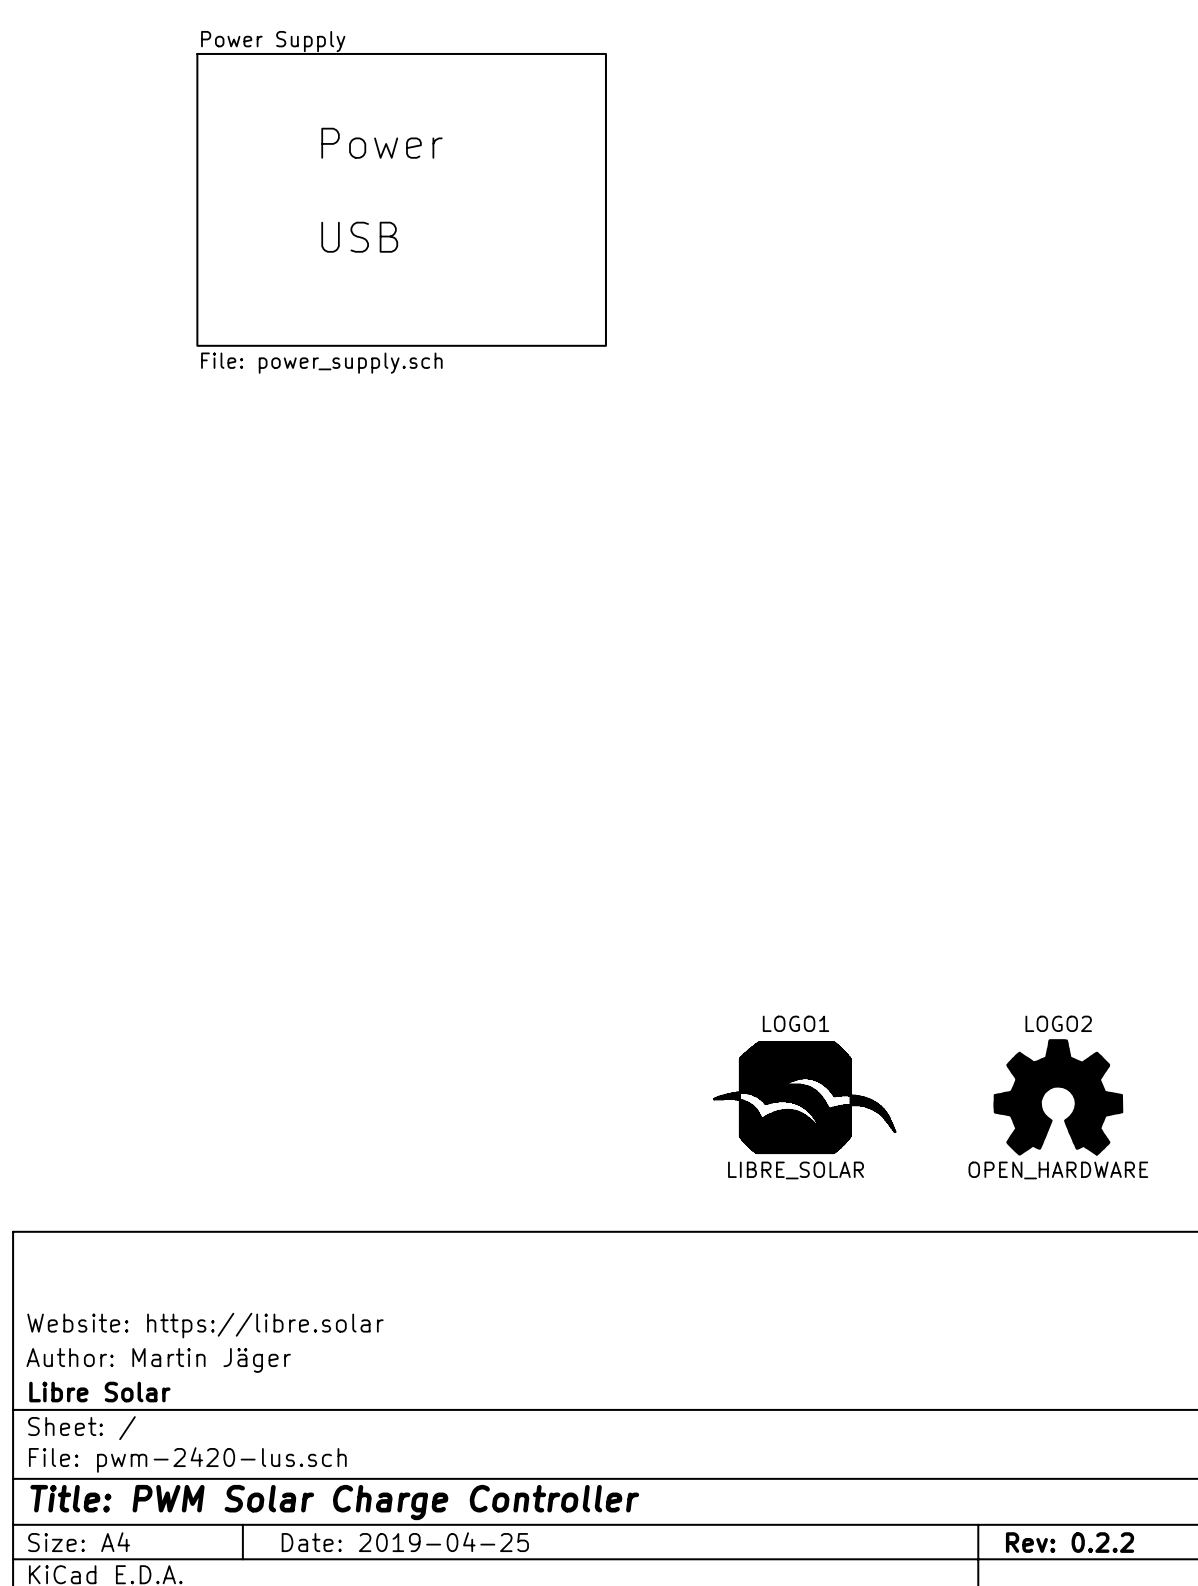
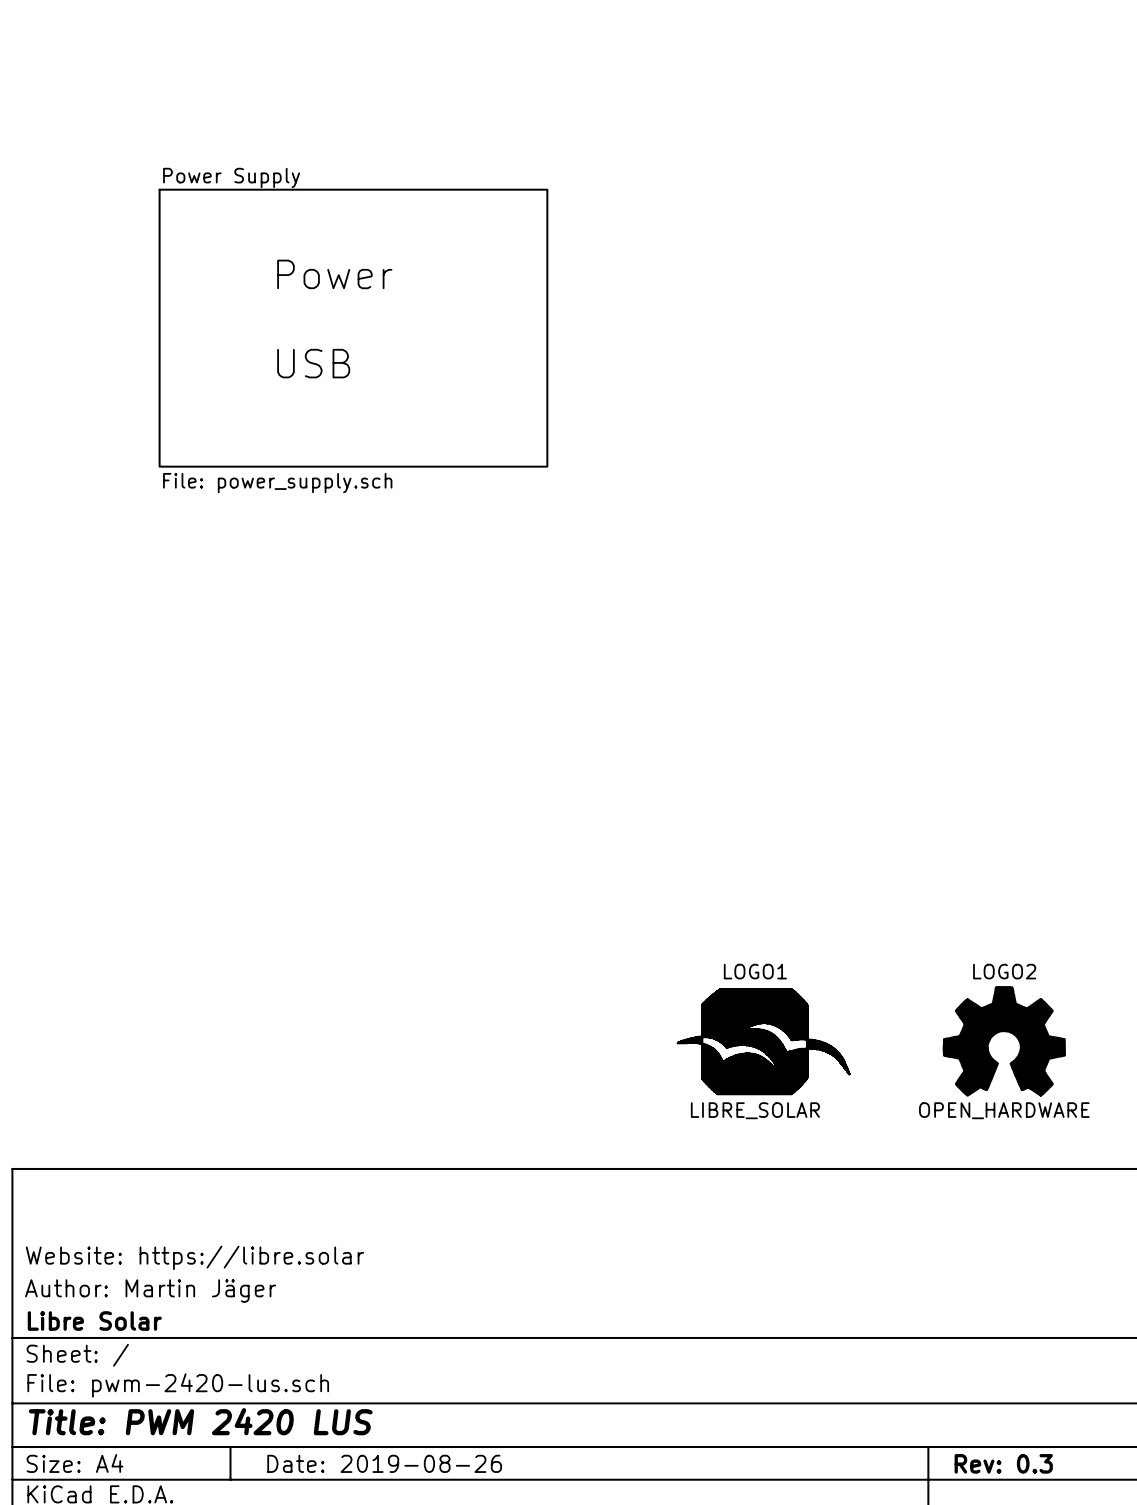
text position: Power (381, 143) -> Power (334, 274)
sheet Power Supply position: (401, 199) -> (353, 328)
text position: USB (359, 237) -> USB (313, 363)
title block: Title: PWM Solar Charge Controller (334, 1502) -> Title: PWM 2420 LUS (200, 1421)
title block: Date: 2019-04-25 (405, 1542) -> Date: 2019-08-26 (384, 1463)
title block: Rev: 0.2.2 (1070, 1542) -> Rev: 0.3 (1003, 1463)

